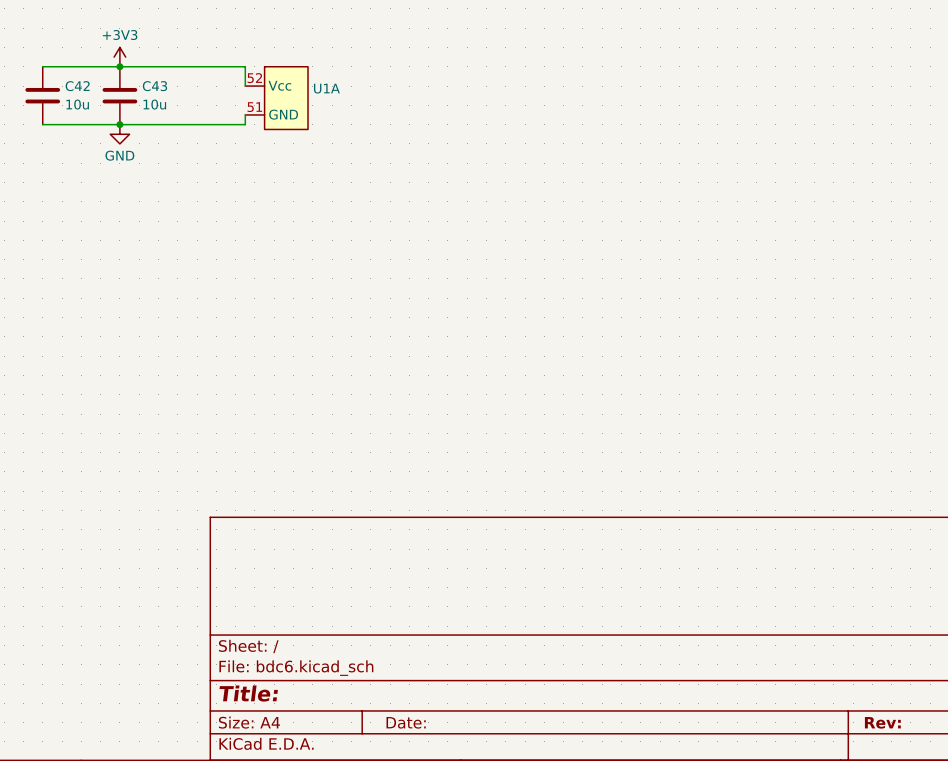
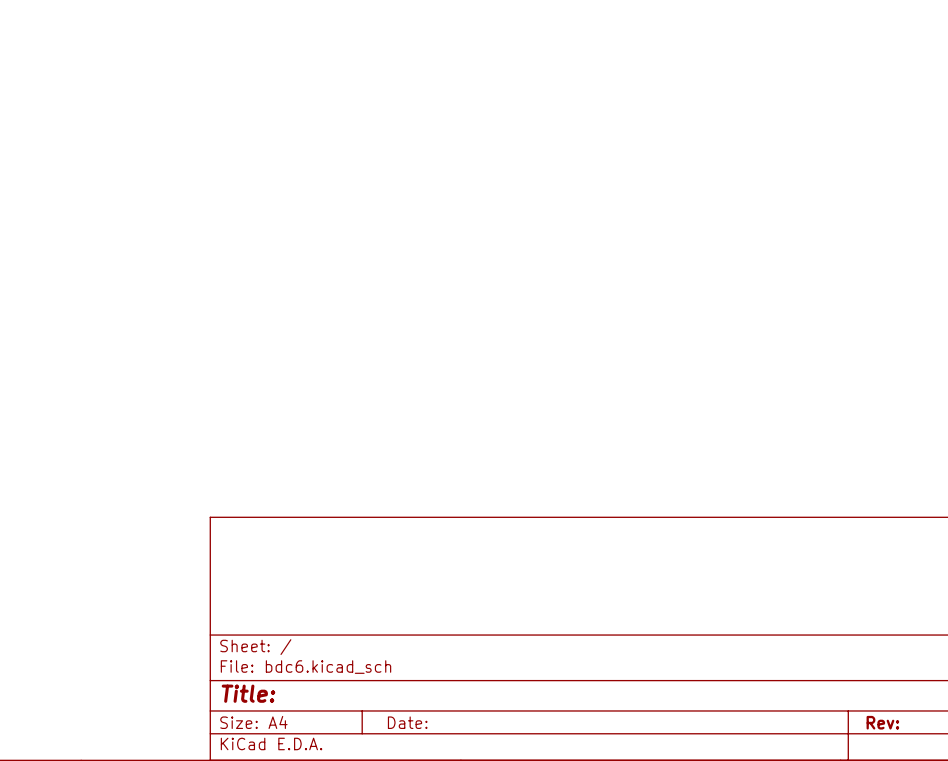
power symbol: +3V3 (119, 57) -> none
wire: (42, 66) (245, 66) (245, 86) -> none
junction: (119, 66) -> none
C42: 10u (42, 95) -> none
C43: 10u (119, 95) -> none
U1A: (276, 98) -> none
wire: (245, 114) (245, 124) (42, 124) -> none
junction: (119, 124) -> none
power symbol: GND (119, 134) -> none

